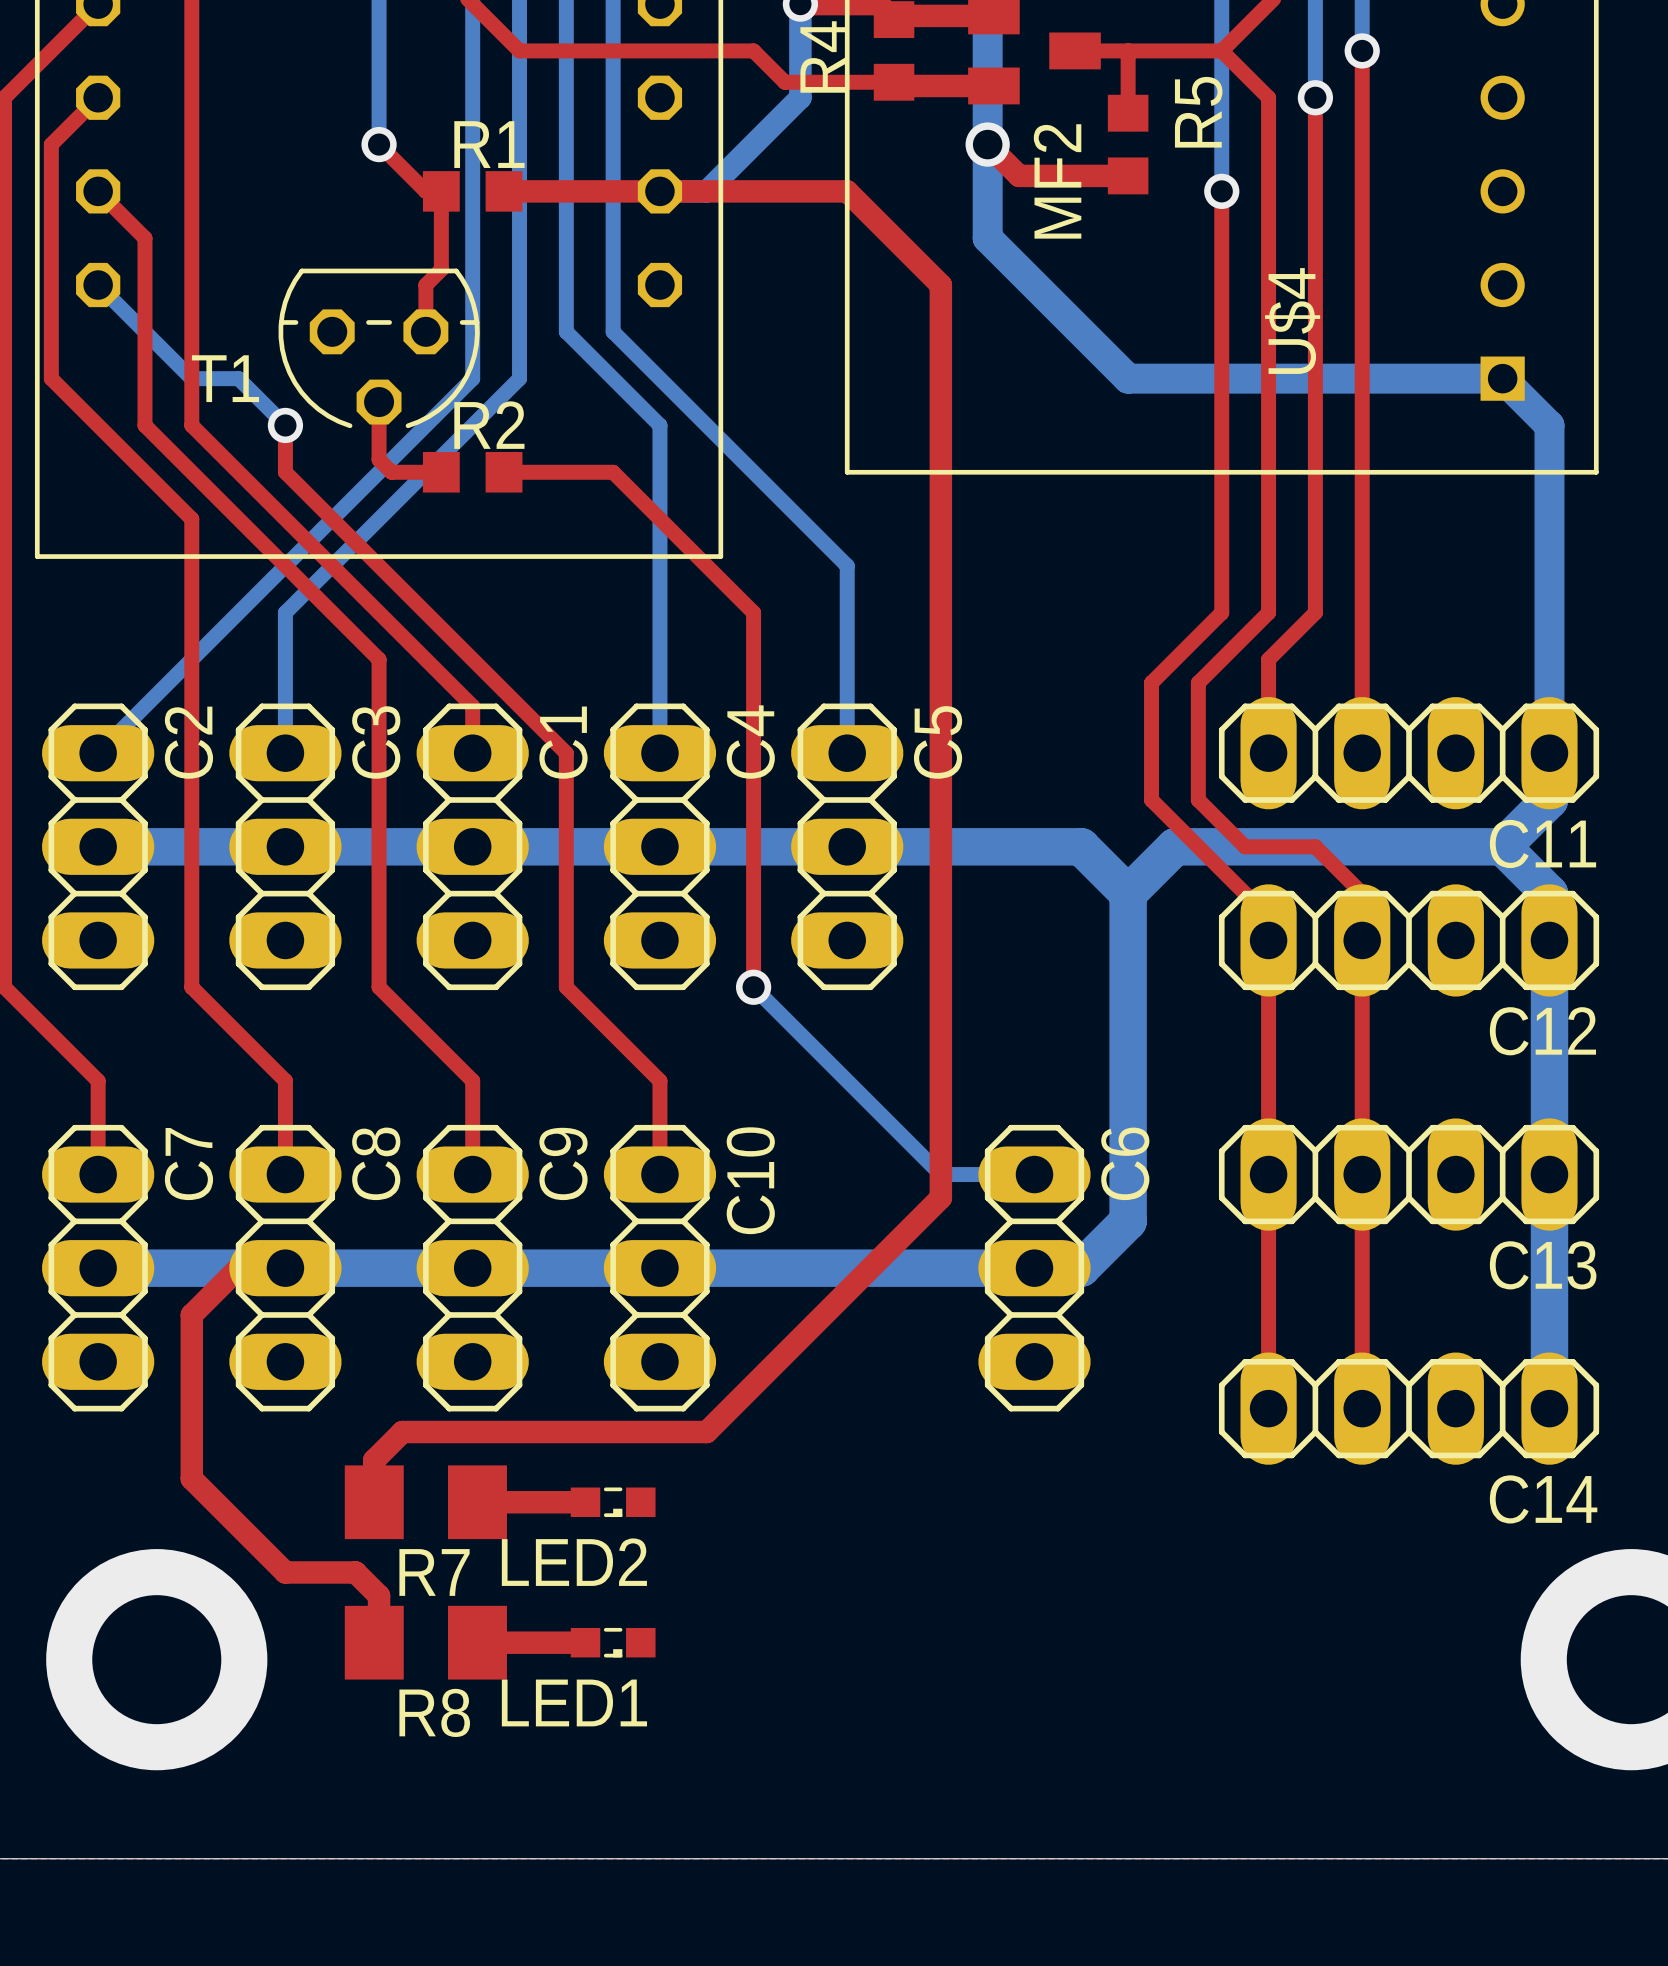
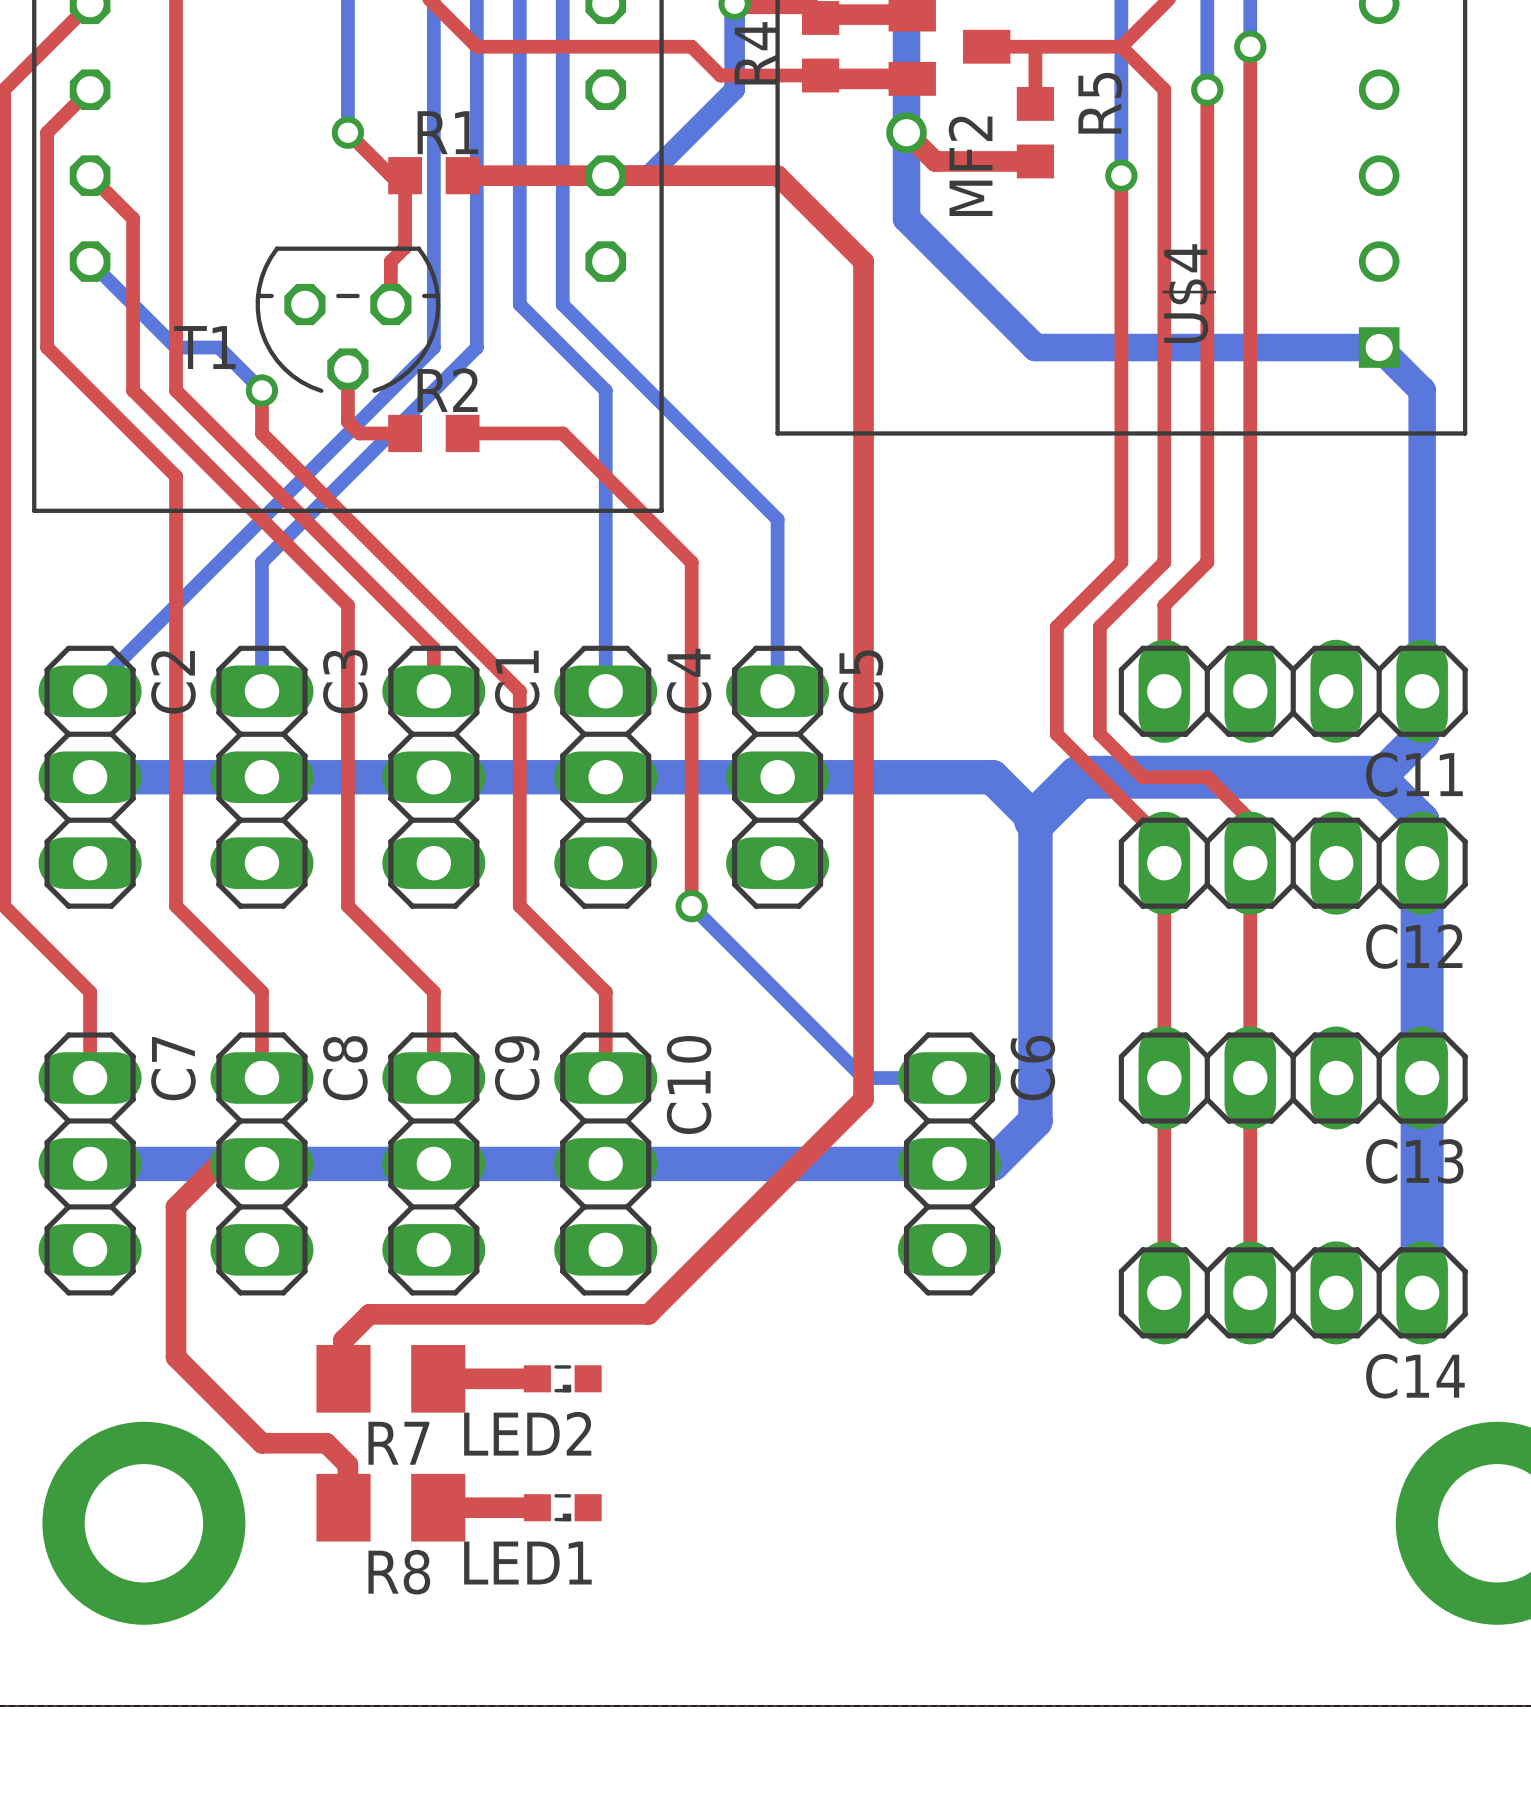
bottom track width: thin (1502, 846) (1174, 846) (1128, 893) -> thick (1379, 777) (1078, 777) (1035, 820)
bottom track width: thin (1549, 940) (1549, 1408) -> thick (1422, 863) (1422, 1292)

